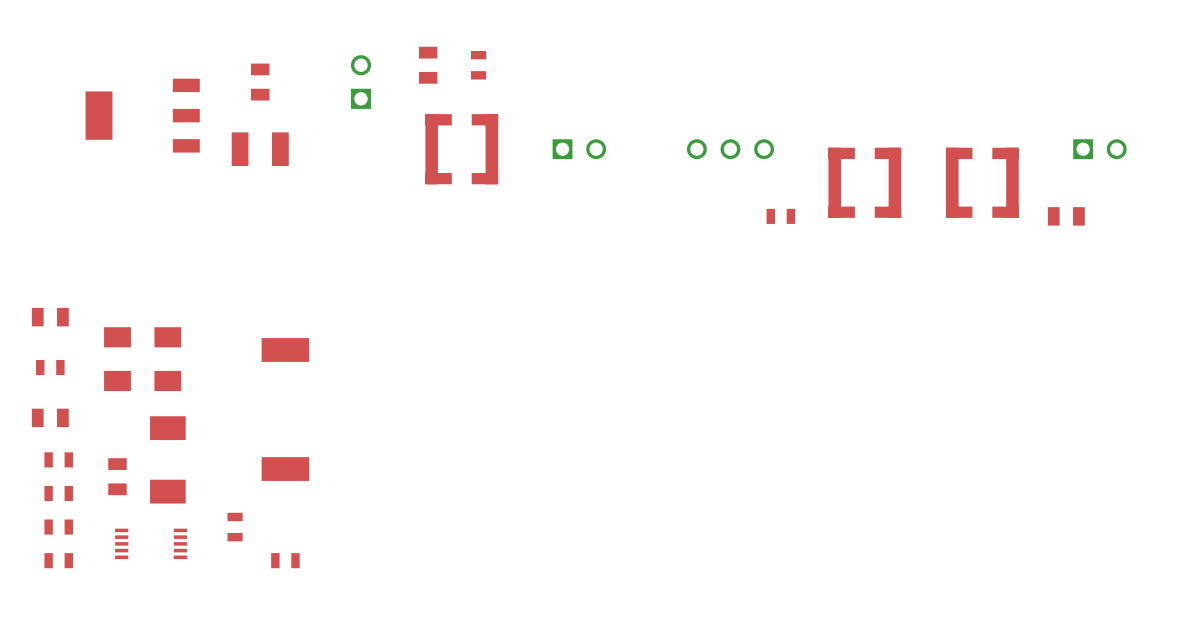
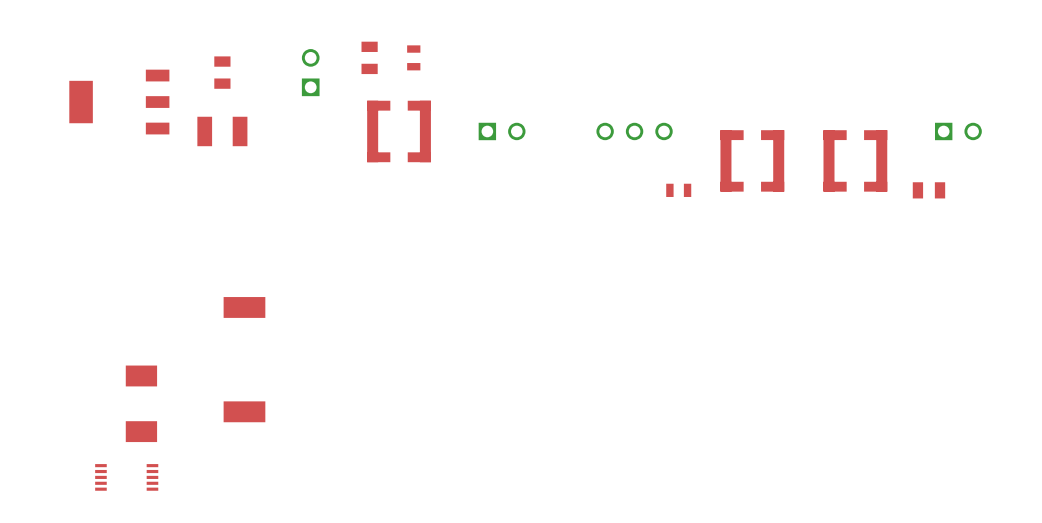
part: (50, 317) -> none
part: (117, 359) -> none
part: (167, 359) -> none
part: (50, 367) -> none
part: (50, 417) -> none
part: (58, 459) -> none
part: (117, 476) -> none
part: (58, 493) -> none
part: (58, 527) -> none
part: (235, 527) -> none
part: (58, 560) -> none
part: (285, 560) -> none

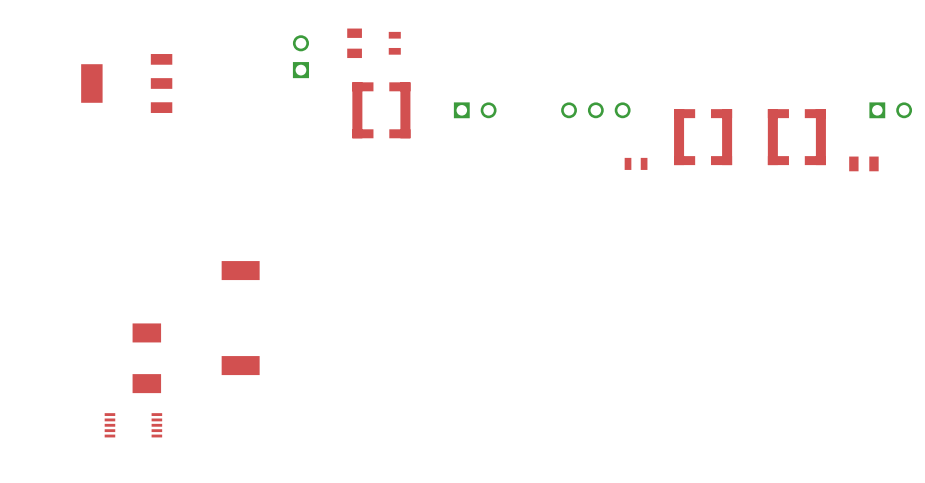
part: (222, 72) -> none
part: (222, 131) -> none

